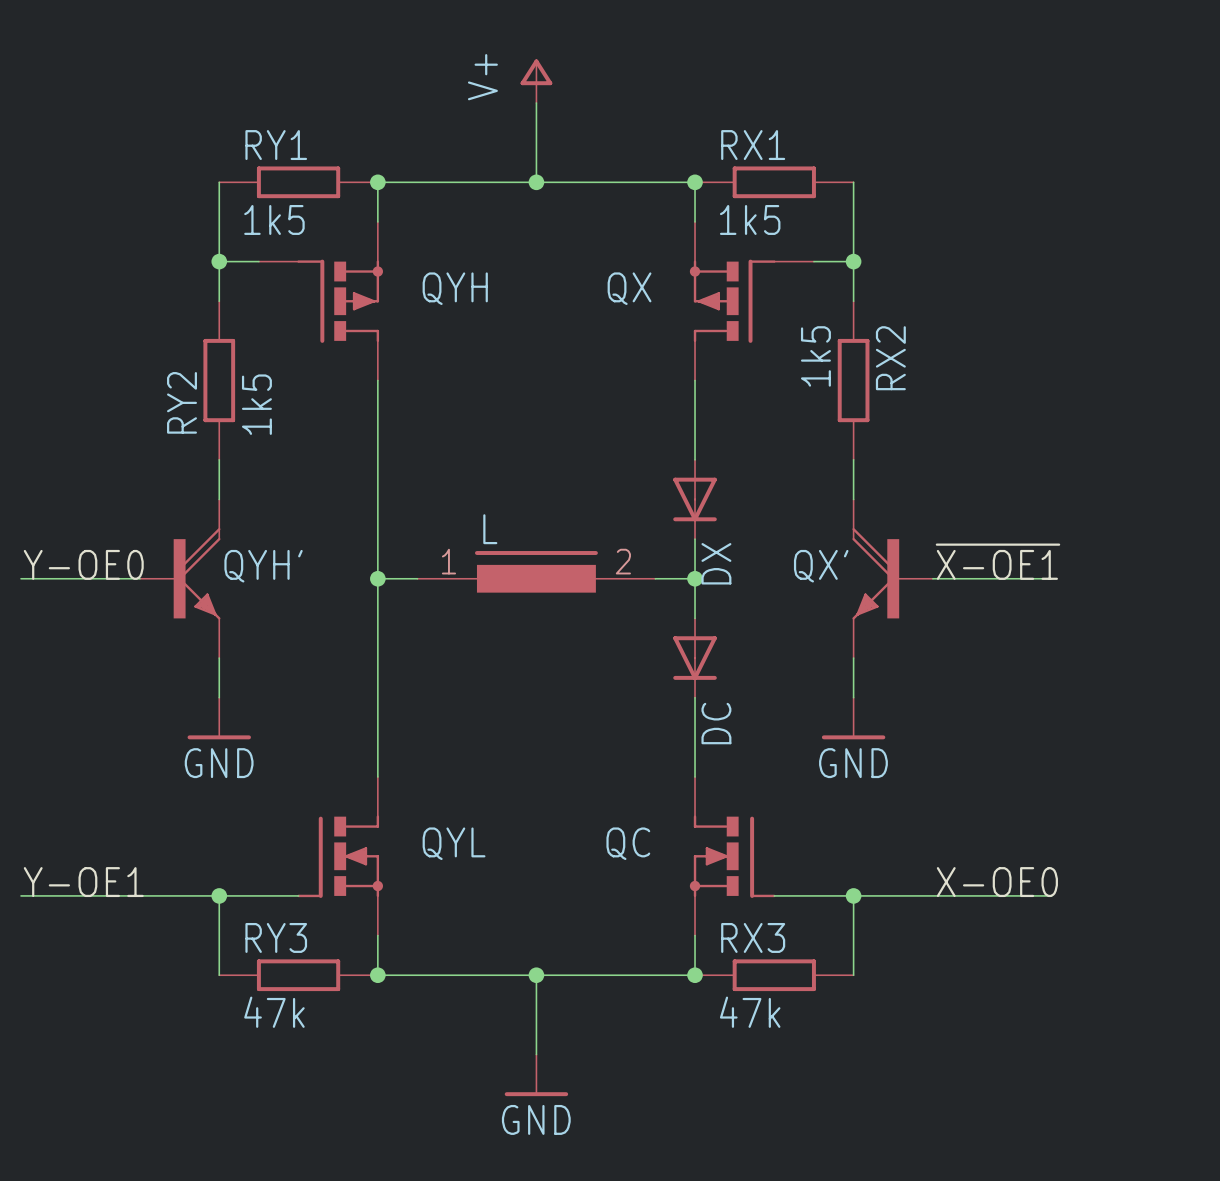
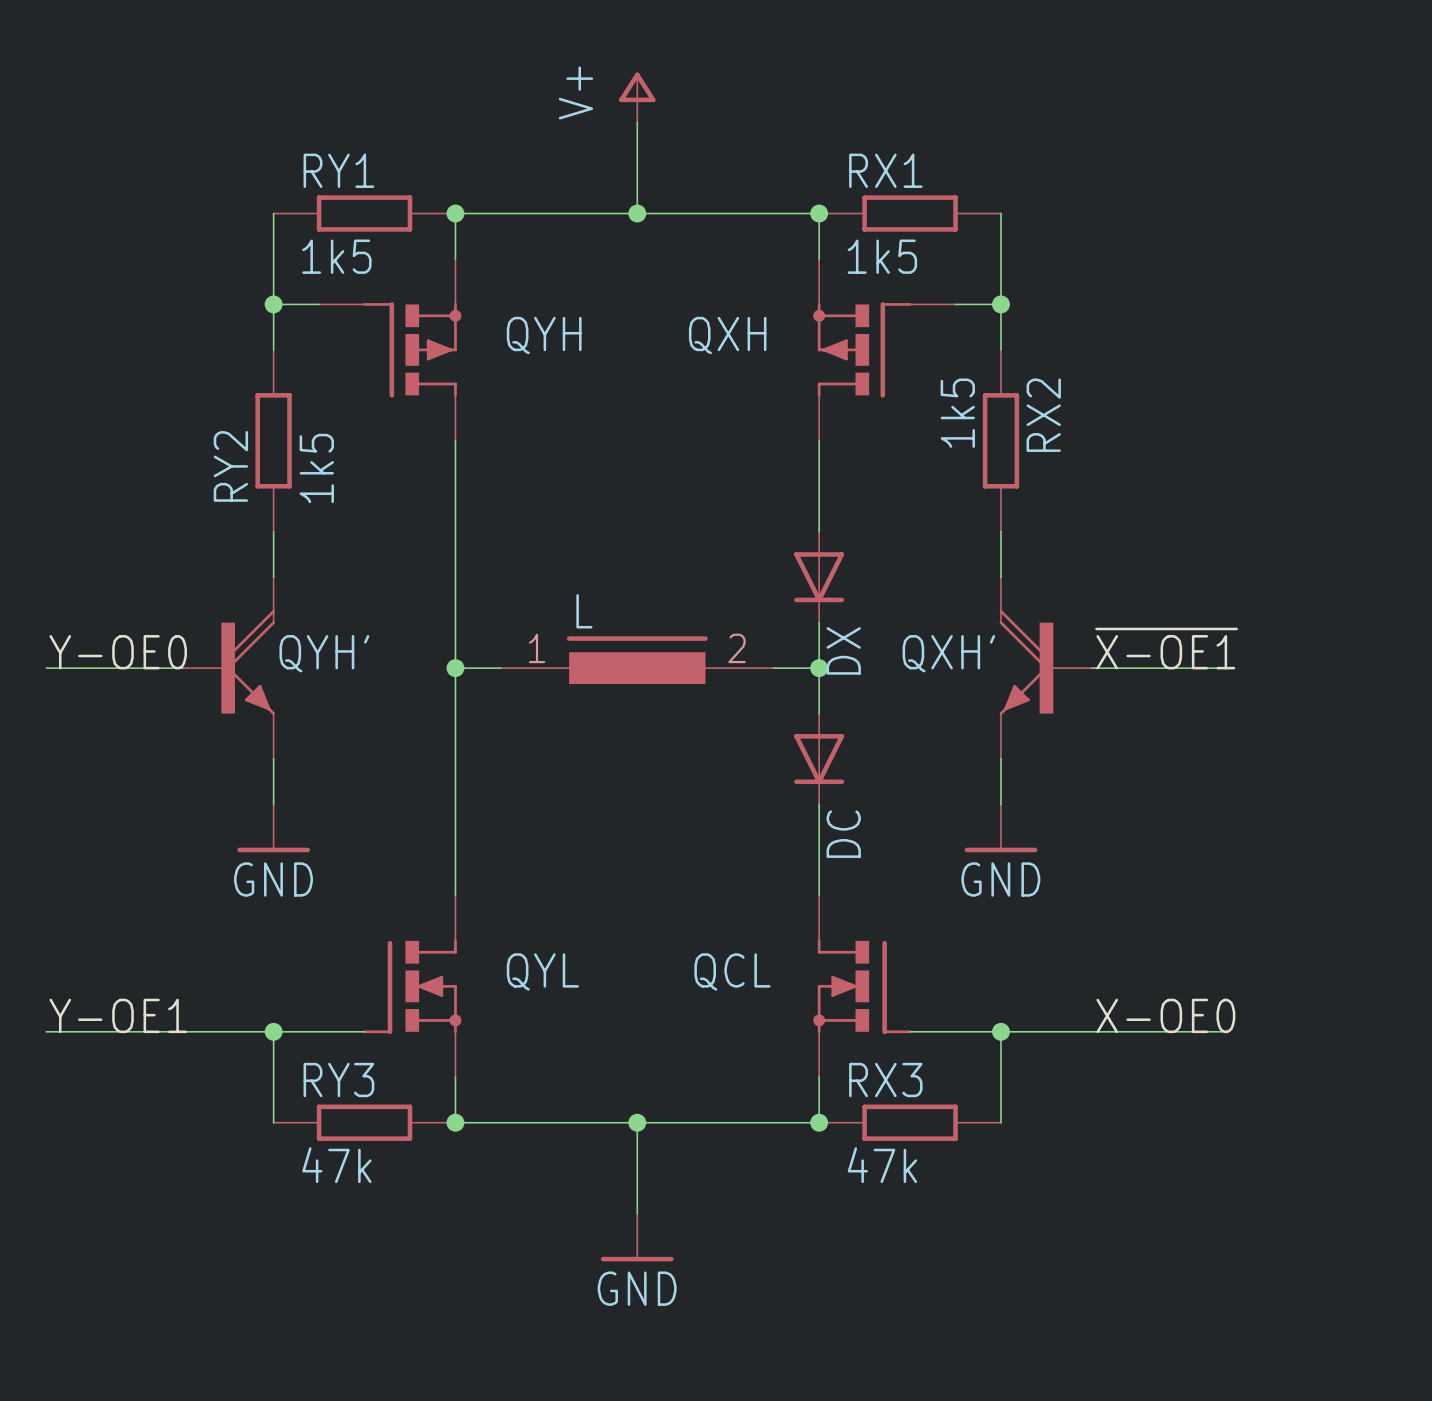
QX name: QX (629, 288) -> QXH (727, 335)
QX' name: QX' (821, 566) -> QXH' (948, 653)
QC name: QC (628, 843) -> QCL (732, 971)

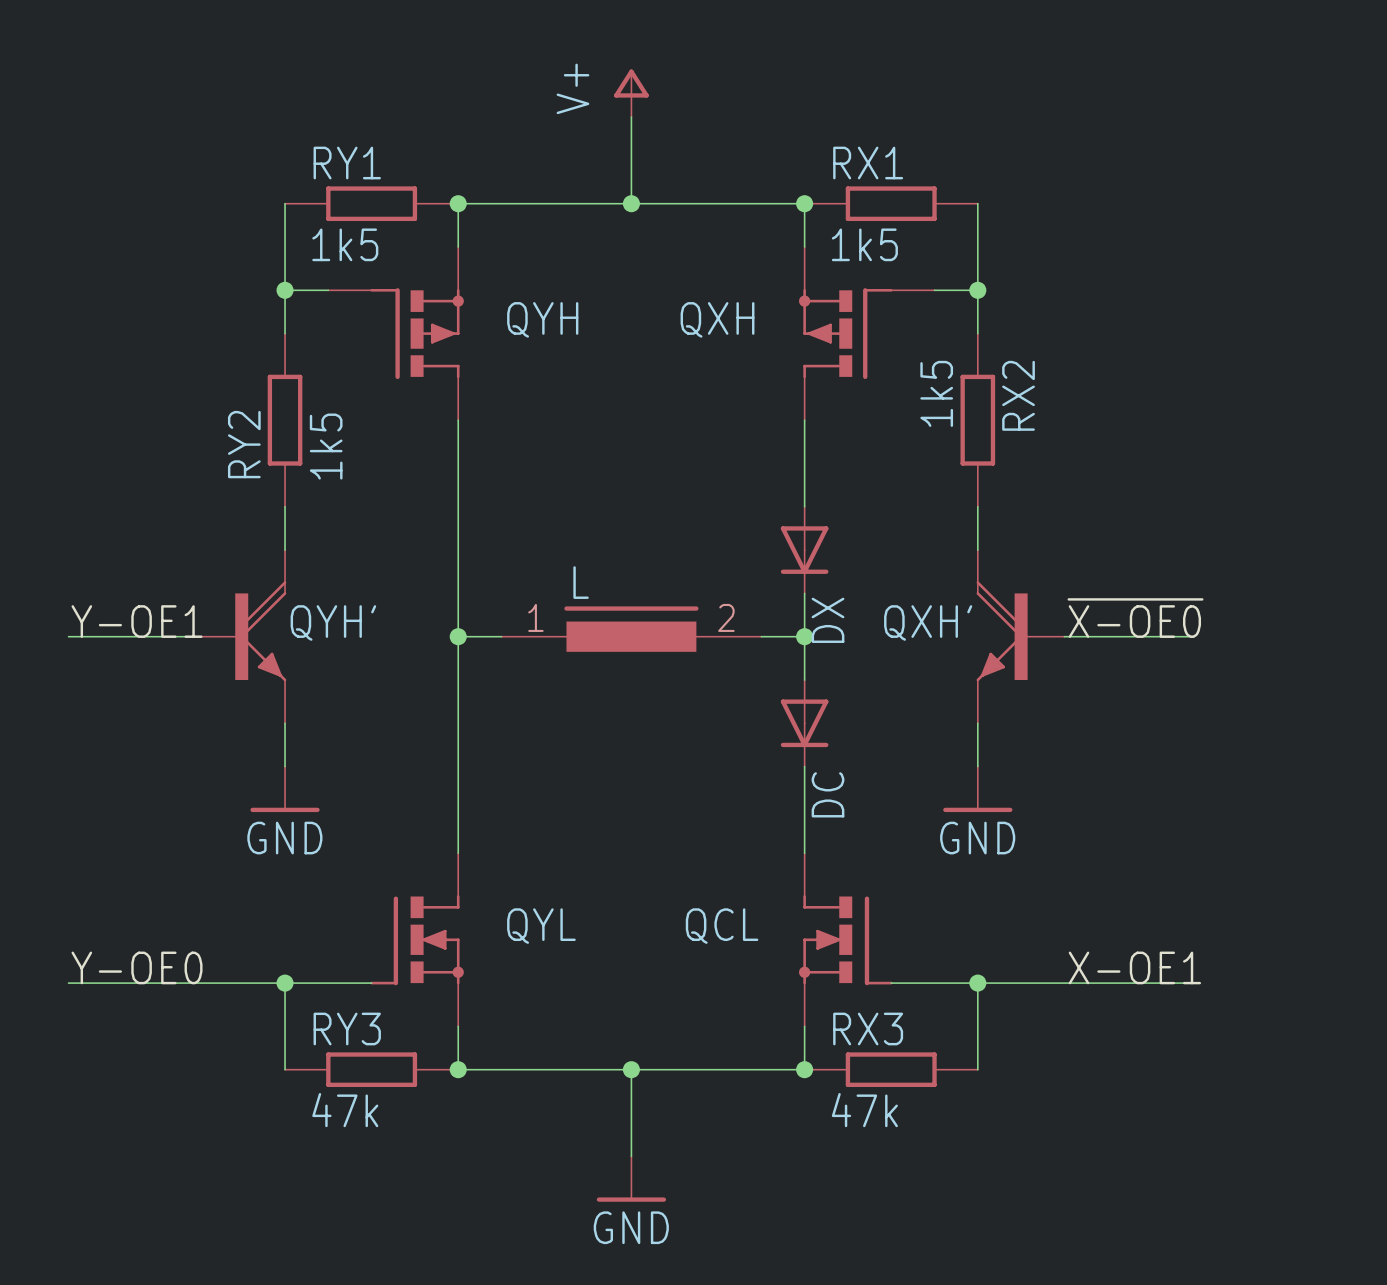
label: ~{X-OE1} (1166, 648) -> ~{X-OE0} (1135, 618)
label: Y-OE0 (118, 652) -> Y-OE1 (137, 621)
label: Y-OE1 (118, 1015) -> Y-OE0 (137, 967)
label: X-OE0 (1165, 1015) -> X-OE1 (1134, 967)

